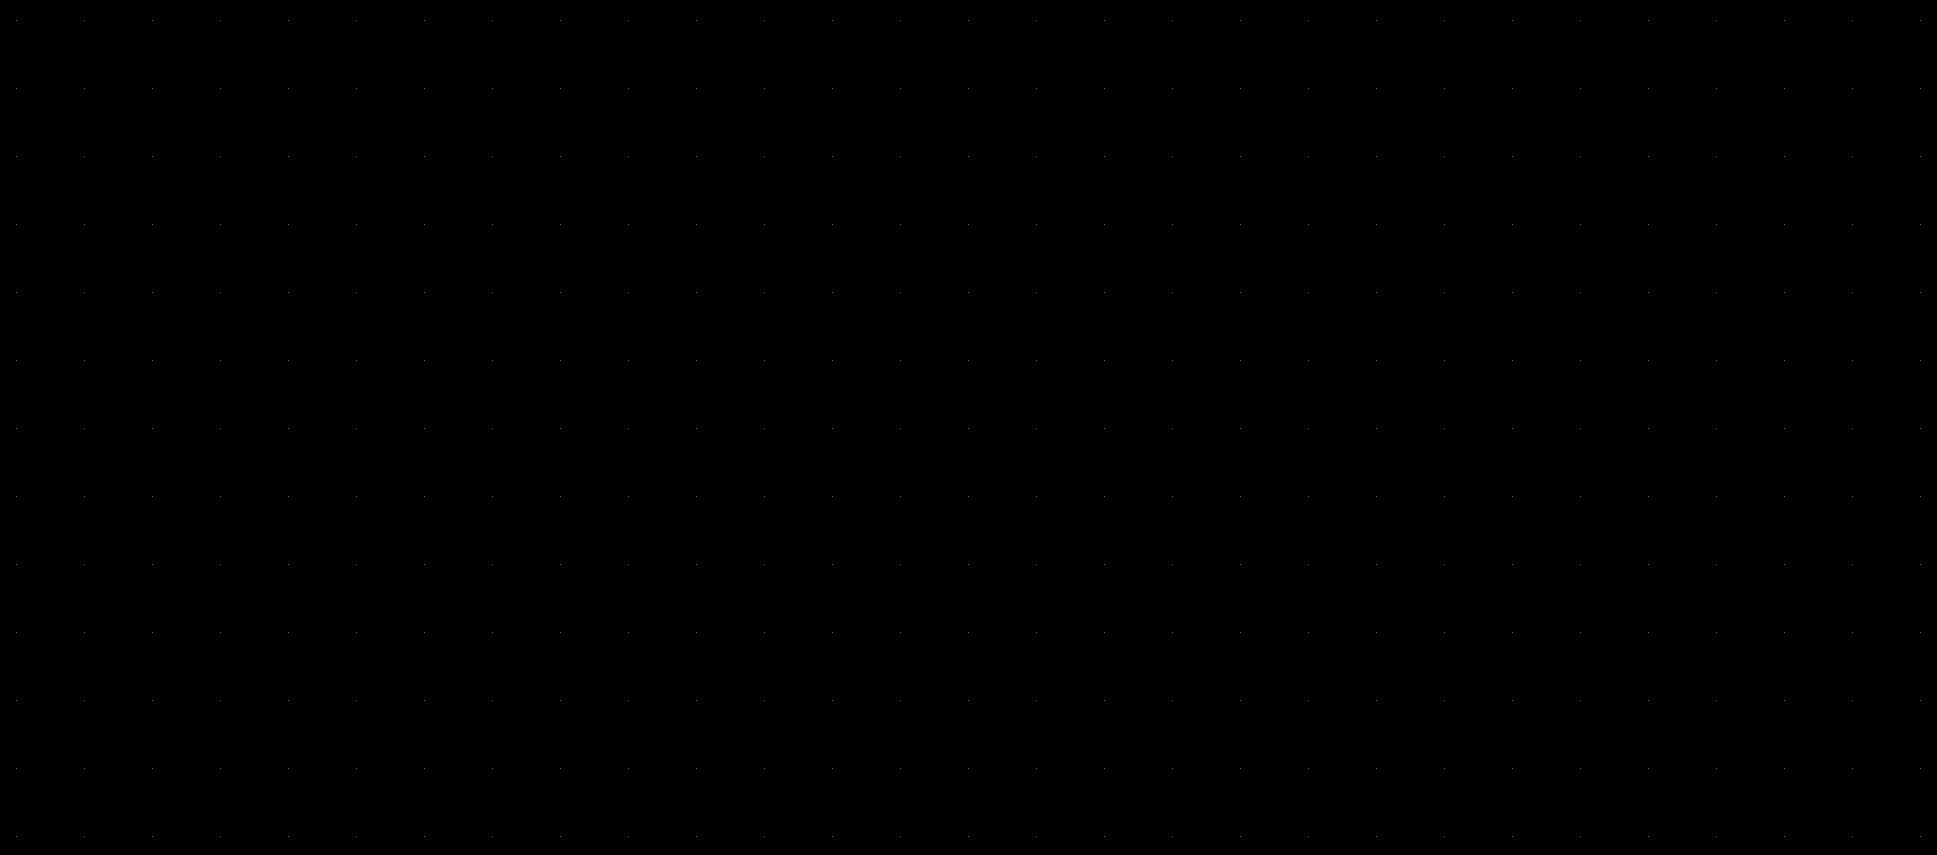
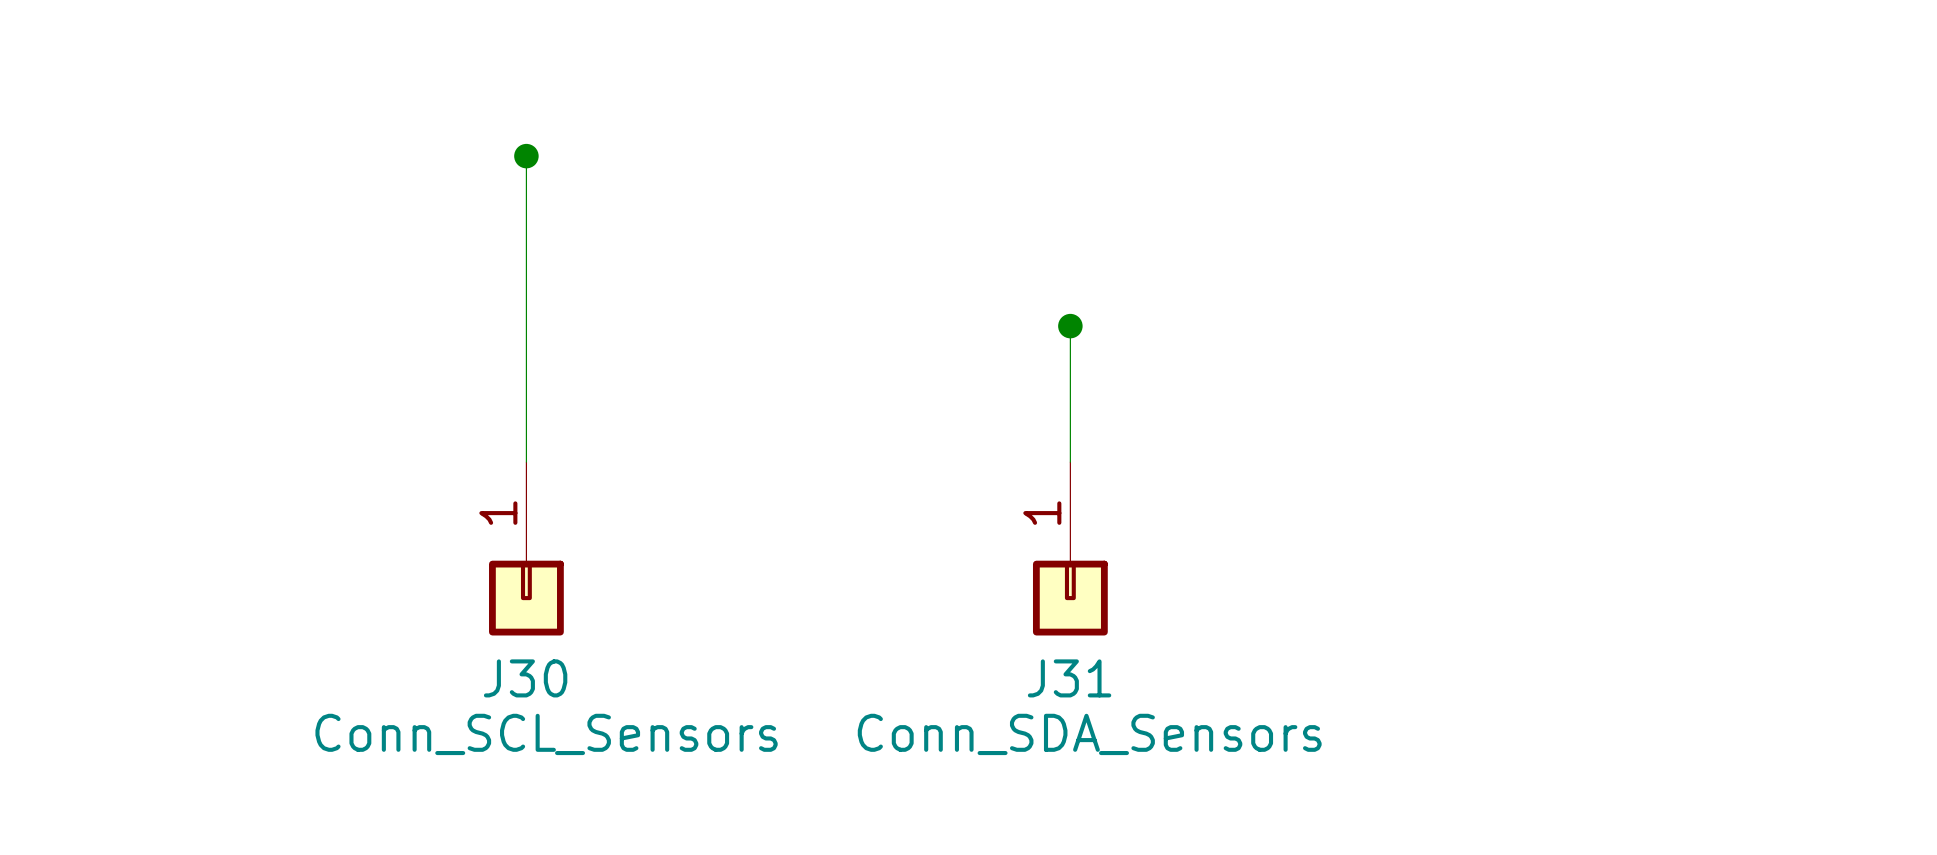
wire: none -> (526, 156) (526, 462)
junction: none -> (526, 156)
wire: none -> (1070, 326) (1070, 462)
junction: none -> (1070, 326)
J30: none -> Conn_SCL_Sensors (526, 548)
J31: none -> Conn_SDA_Sensors (1070, 548)

